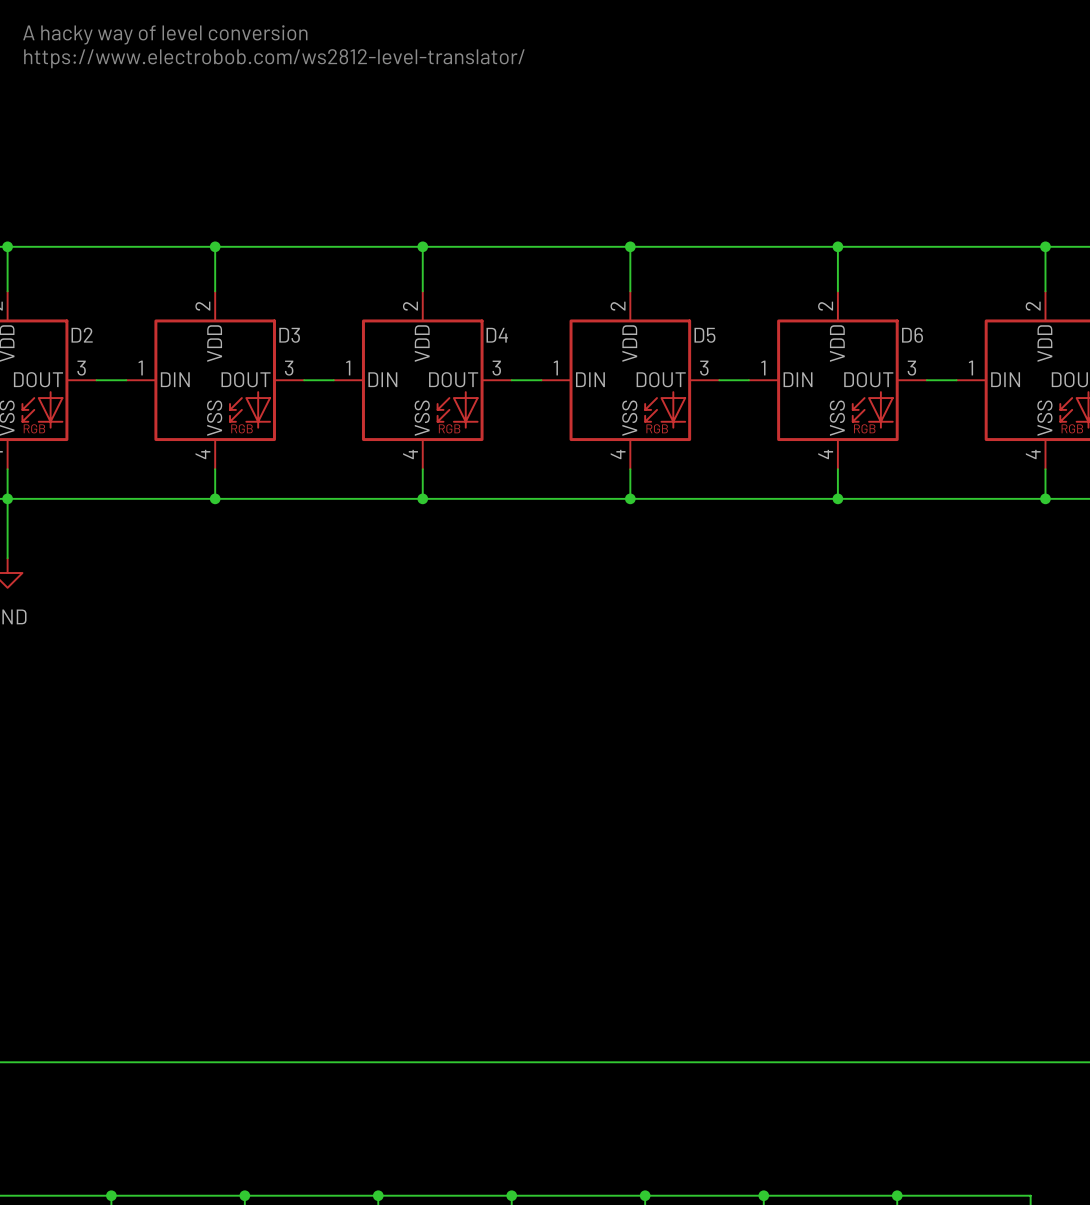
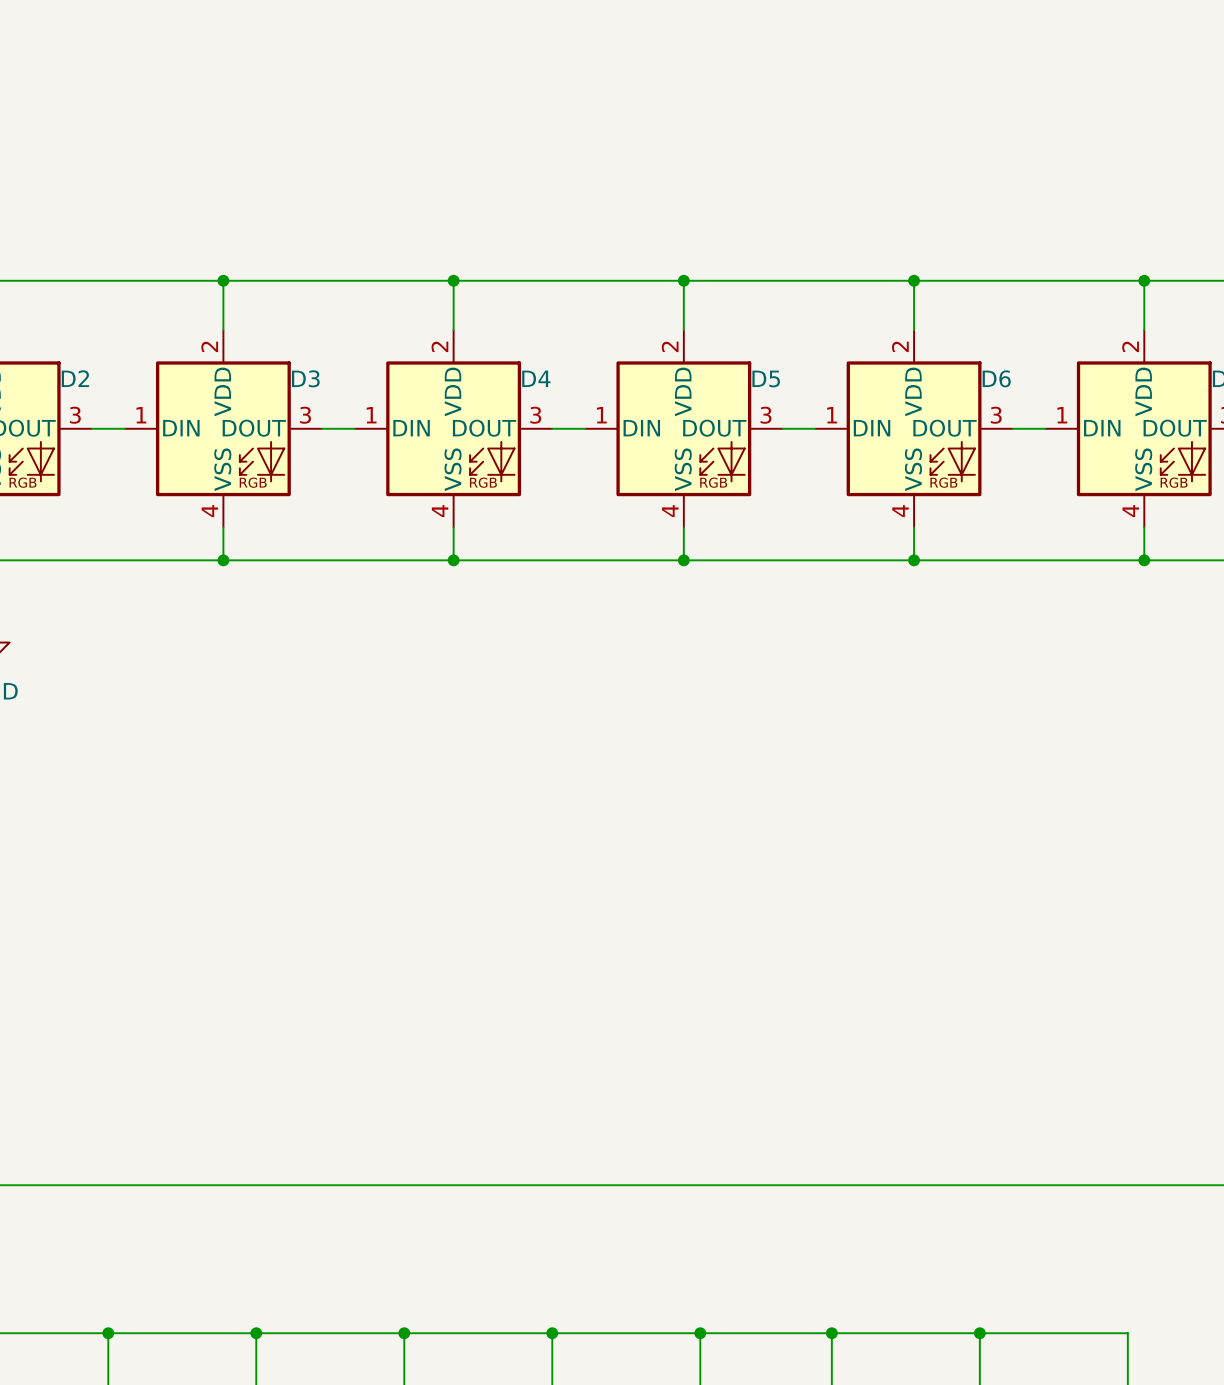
text: A hacky way of level conversion (165, 34) -> none
text: https://www.electrobob.com/ws2812-level-translator/ (274, 58) -> none

